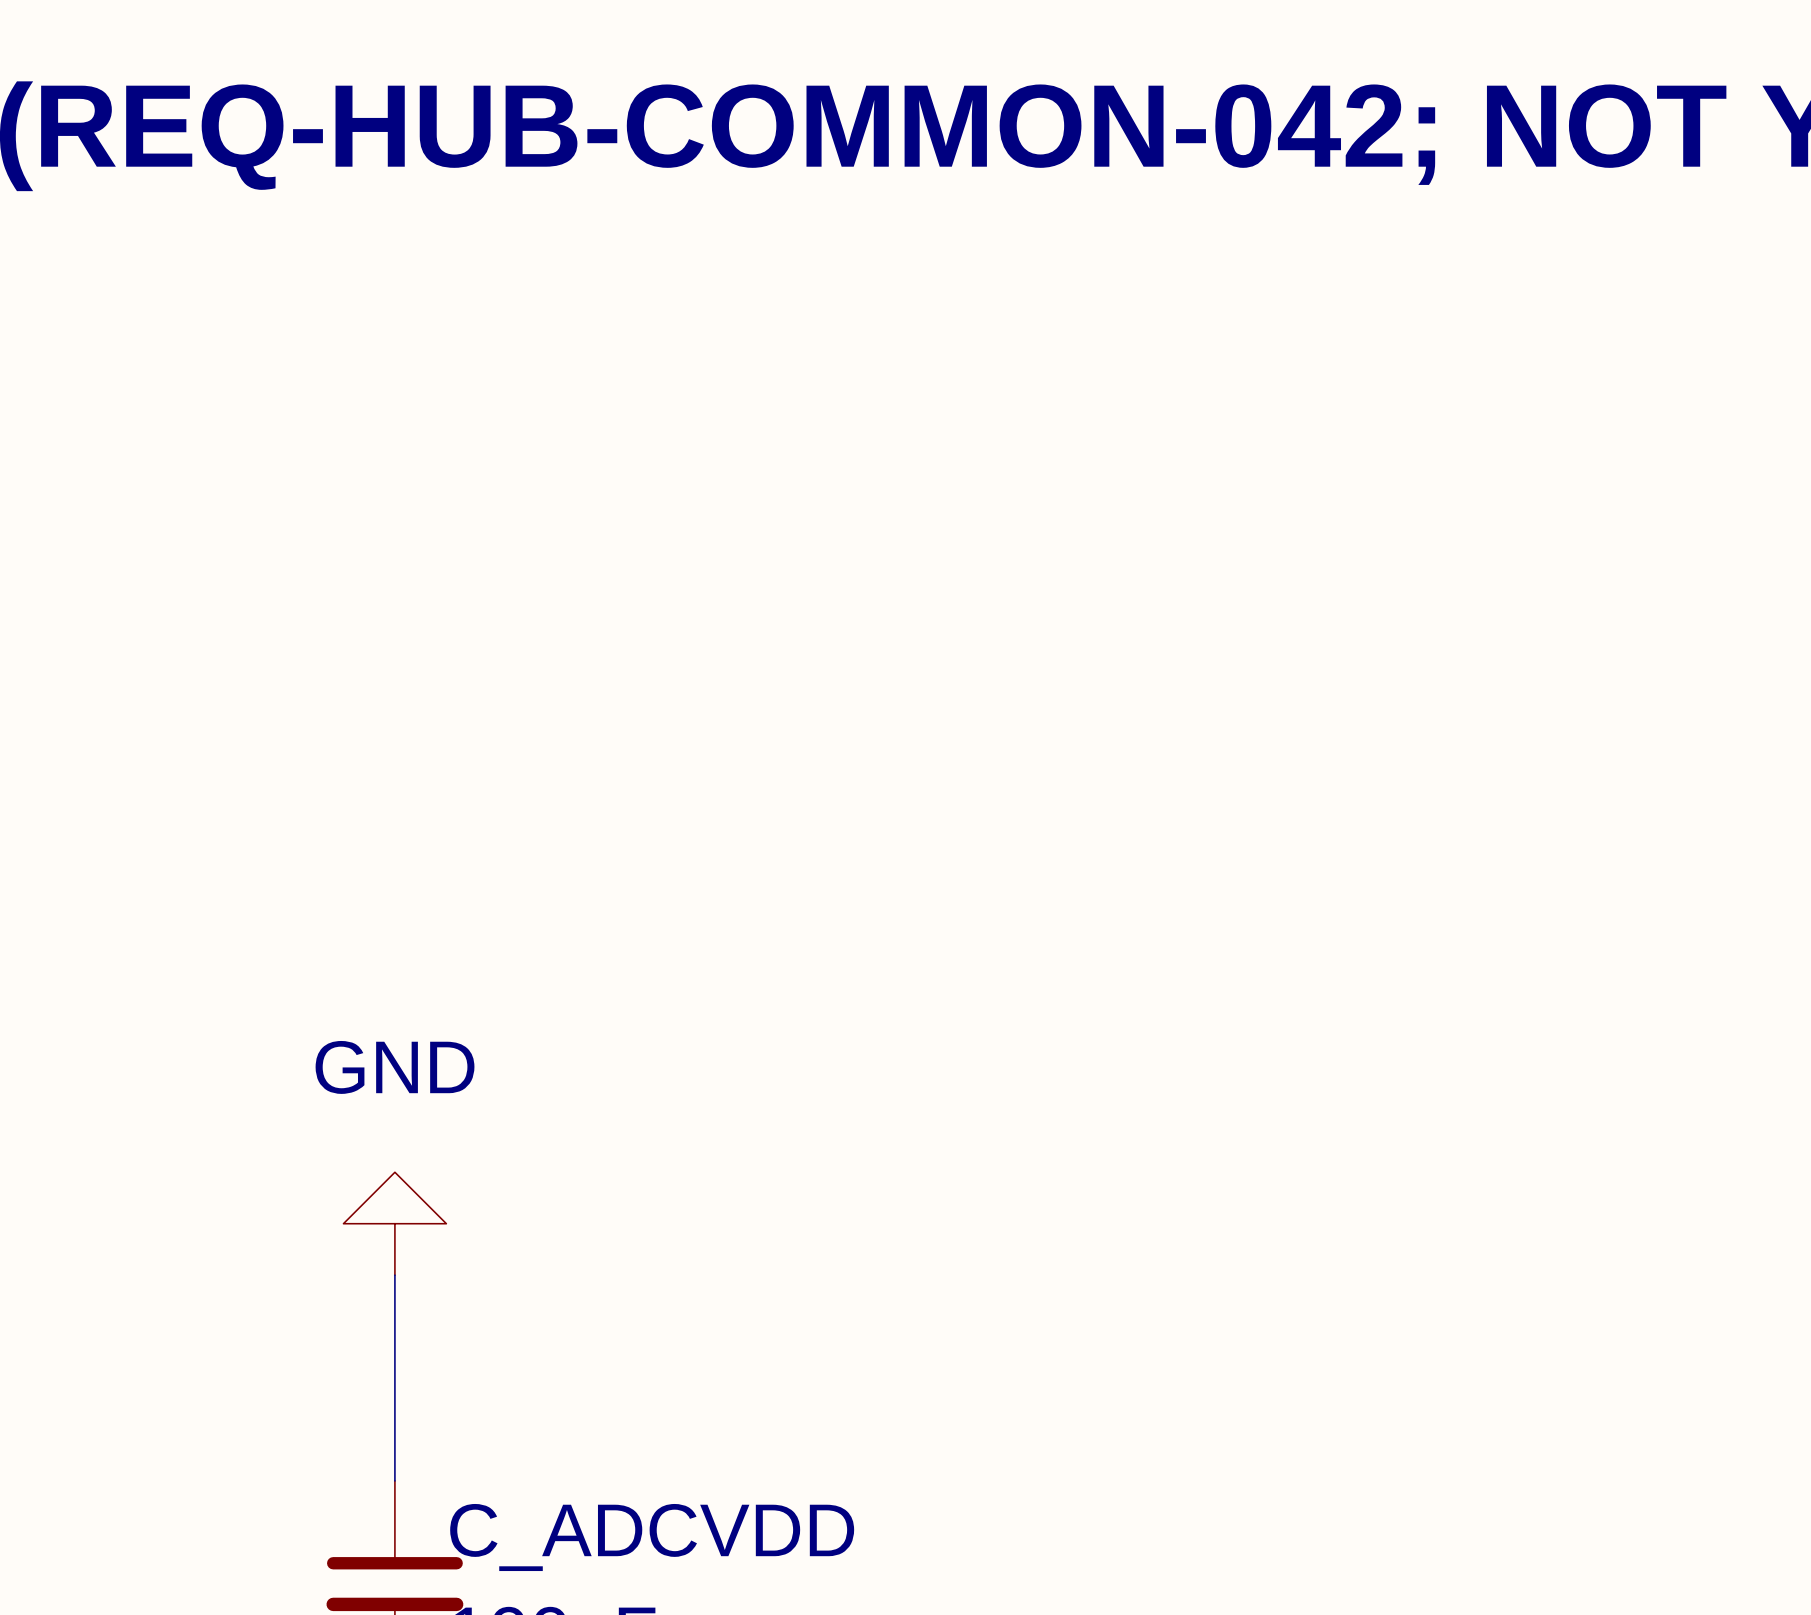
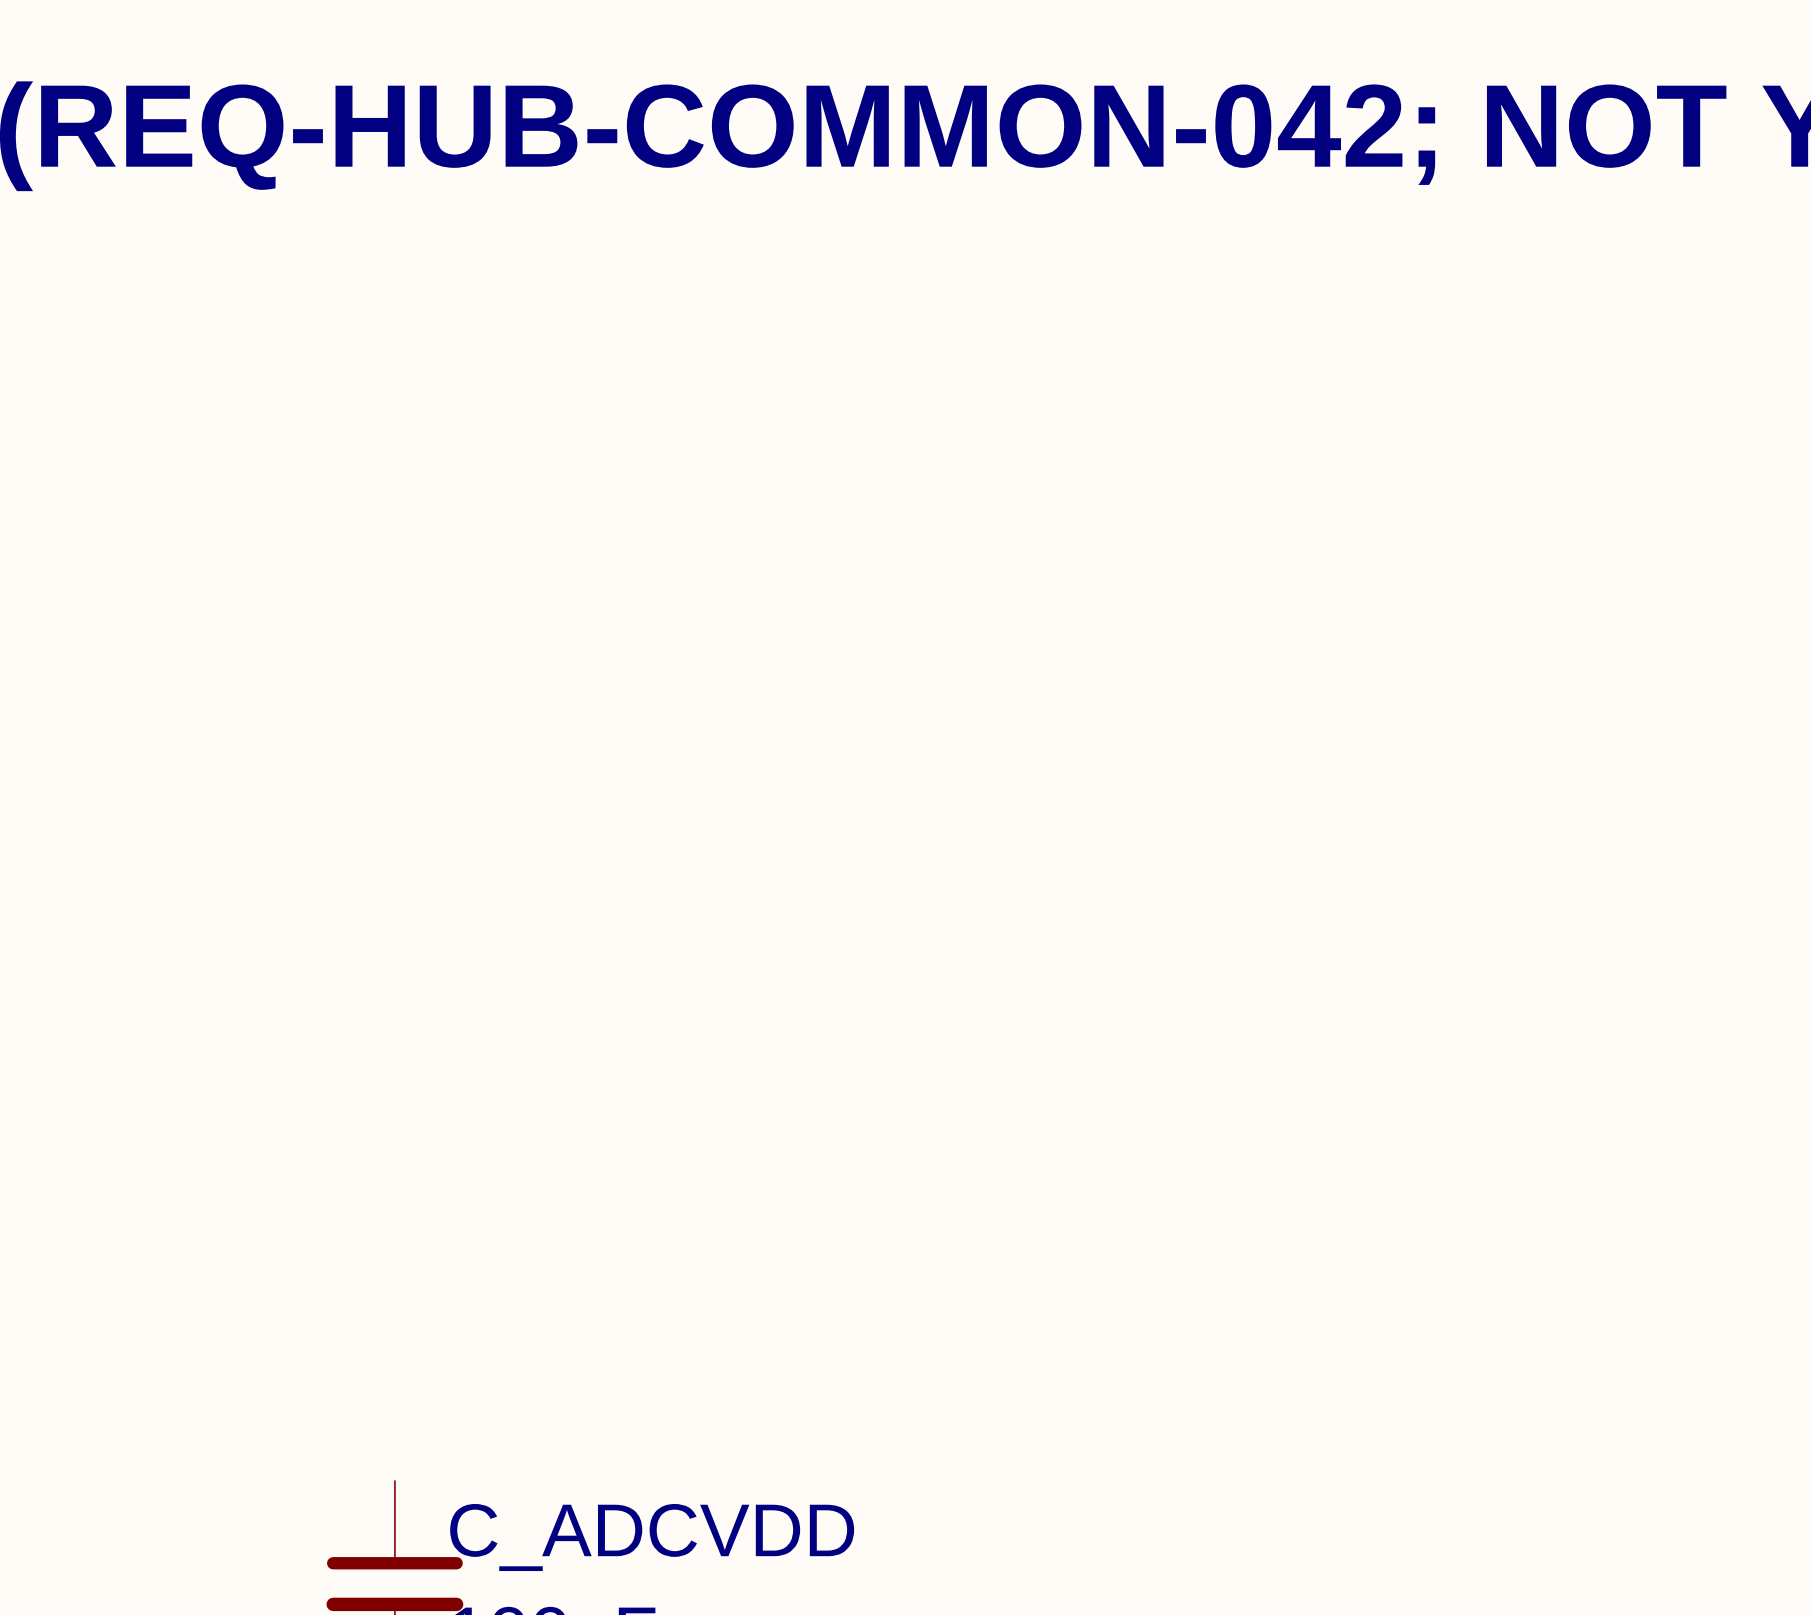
power symbol: GND (394, 1223) -> none
wire: (394, 1275) (394, 1480) -> none

